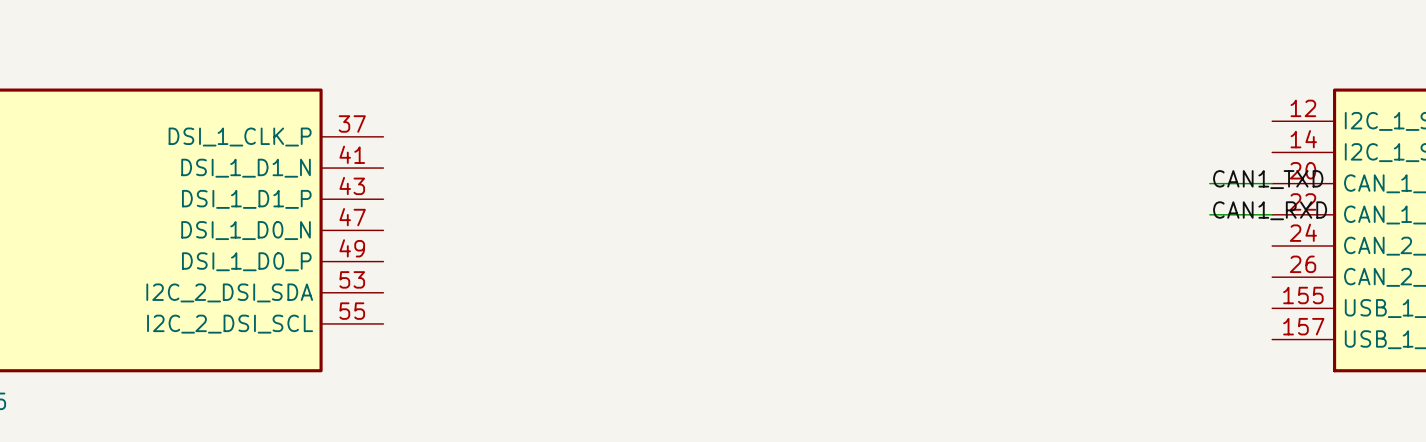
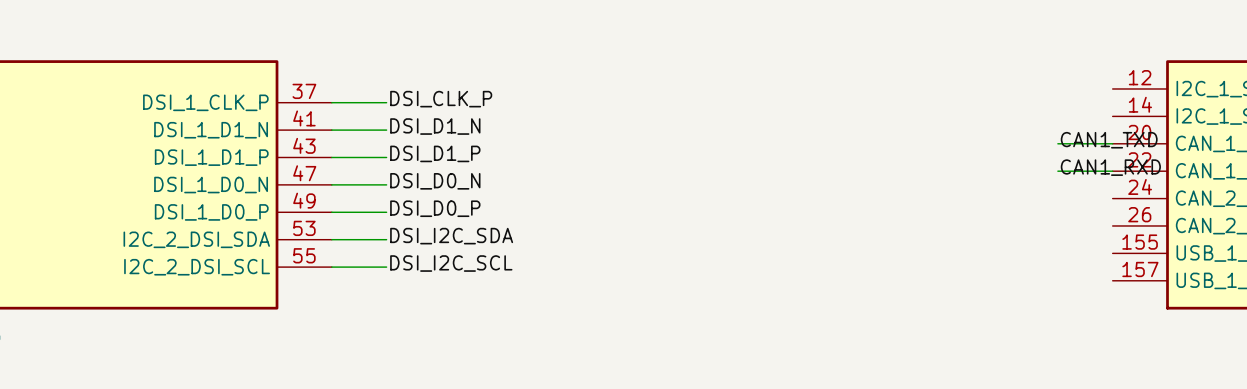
label: none -> DSI_CLK_P (441, 99)
wire: none -> (331, 102) (386, 102)
label: none -> DSI_D1_N (435, 126)
wire: none -> (331, 130) (386, 130)
label: none -> DSI_D1_P (435, 153)
wire: none -> (331, 157) (386, 157)
label: none -> DSI_D0_N (435, 181)
wire: none -> (331, 184) (386, 184)
label: none -> DSI_D0_P (435, 208)
wire: none -> (331, 212) (386, 212)
label: none -> DSI_I2C_SDA (451, 236)
wire: none -> (331, 239) (386, 239)
label: none -> DSI_I2C_SCL (451, 263)
wire: none -> (331, 267) (386, 267)

